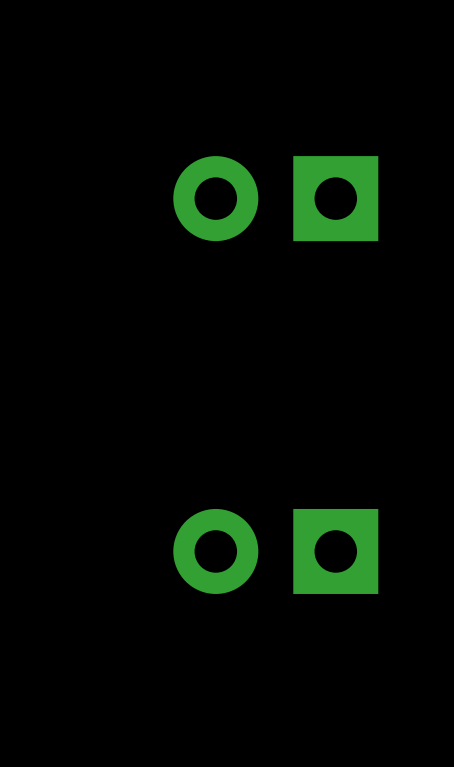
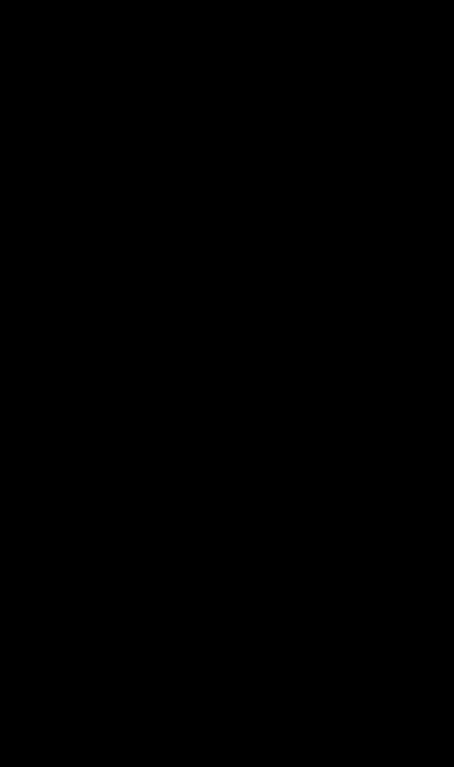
part: (275, 198) -> none
part: (275, 551) -> none

